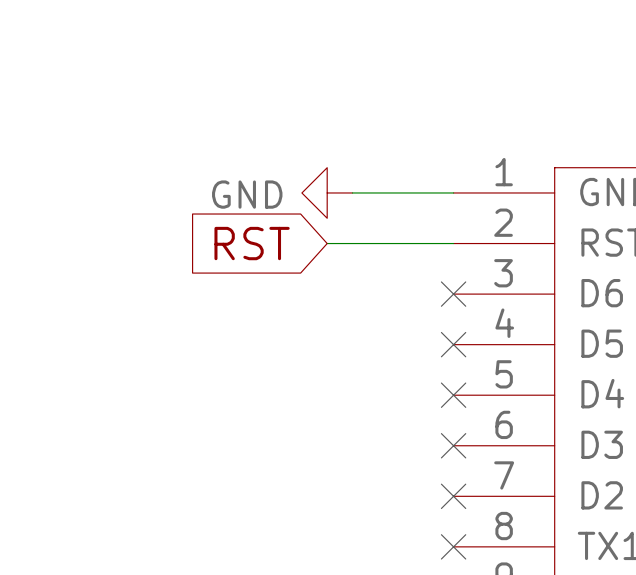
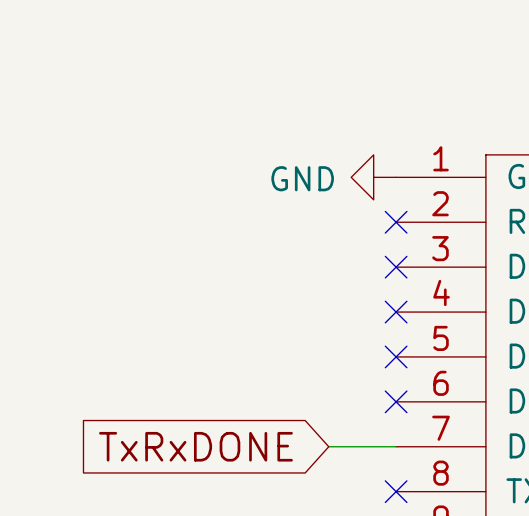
power symbol position: GND (327, 192) -> GND (373, 177)
wire: (352, 192) (453, 192) -> none
global label: RST (252, 243) -> none
wire: (327, 243) (453, 243) -> none
no-connect mark: none -> (396, 222)
global label: none -> TxRxDONE (195, 446)
wire: none -> (328, 446) (396, 446)
no-connect mark: (453, 496) -> none

